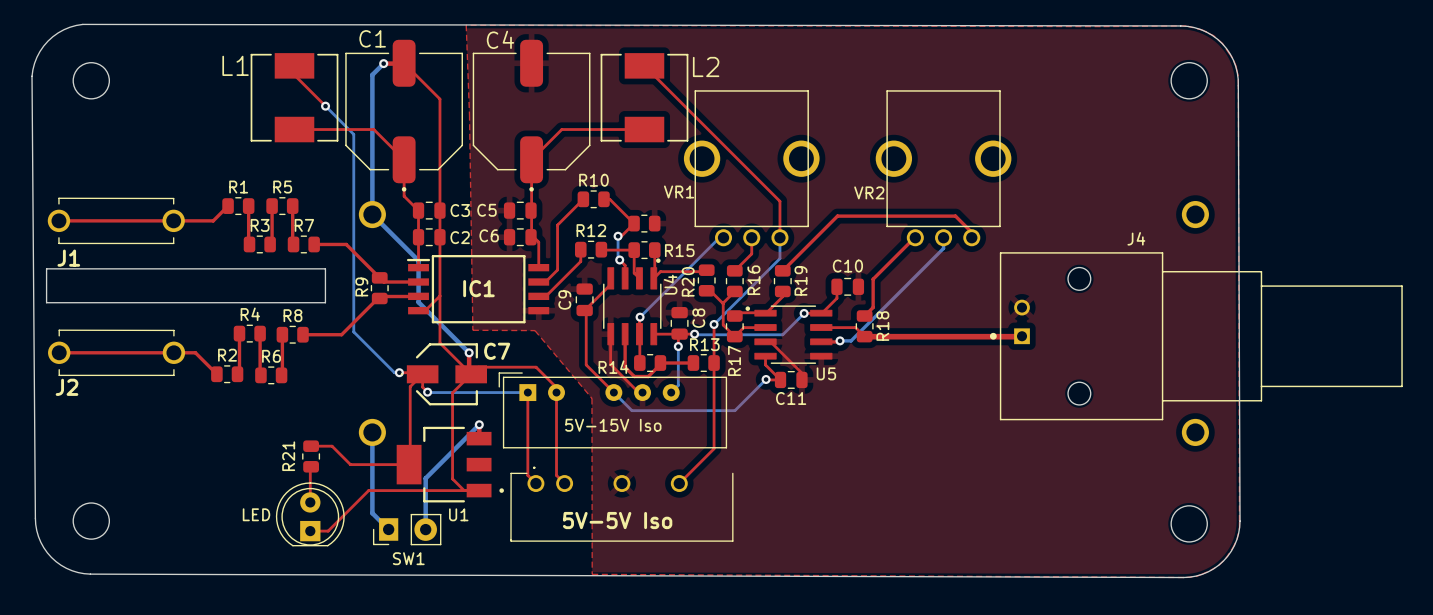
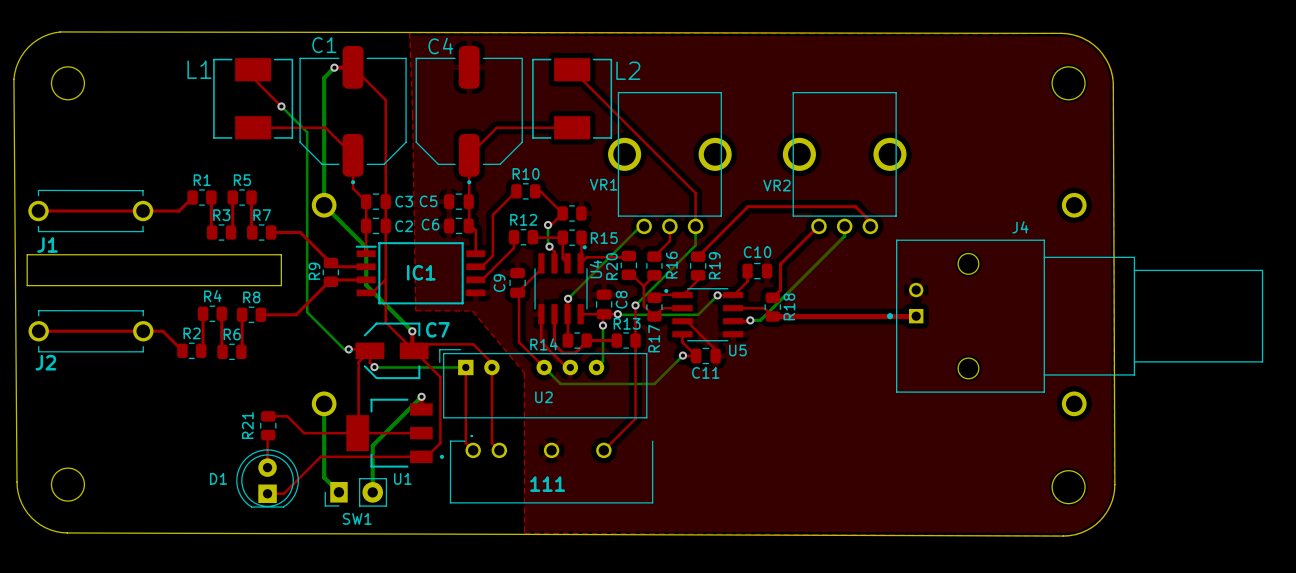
top track: (471, 374) (452, 392) (452, 478) (464, 490) -> (414, 350) (440, 377) (440, 443) (426, 456) (421, 456)
5V-15V Iso name: 5V-15V Iso (613, 425) -> U2 (543, 397)
top track: none -> (357, 433) (421, 433)
LED name: LED (256, 514) -> D1 (218, 478)
5V-5V Iso name: 5V-5V Iso (617, 520) -> 111 (547, 484)

